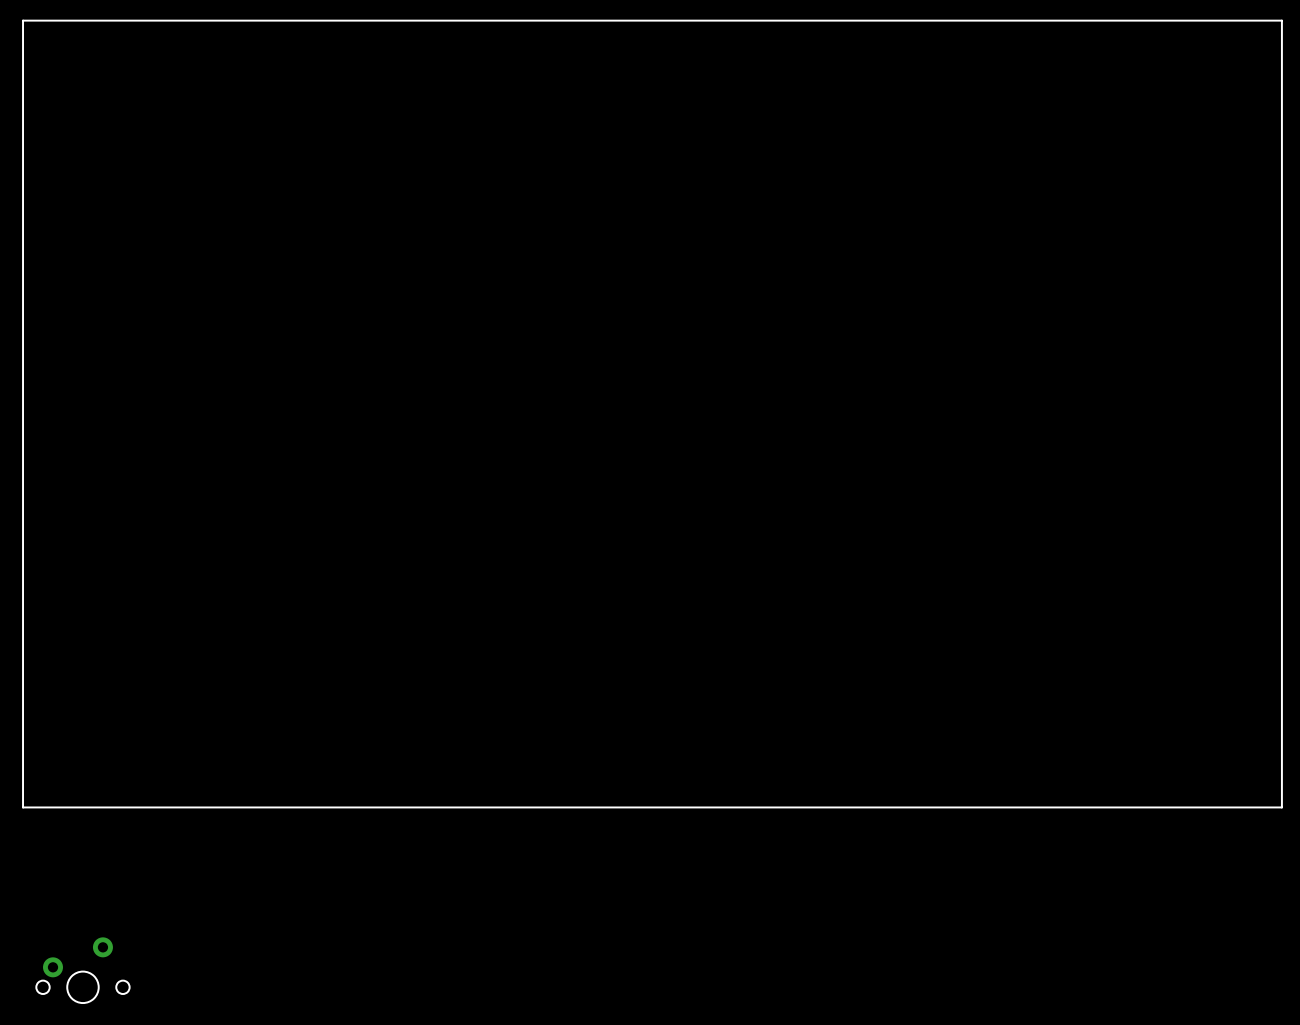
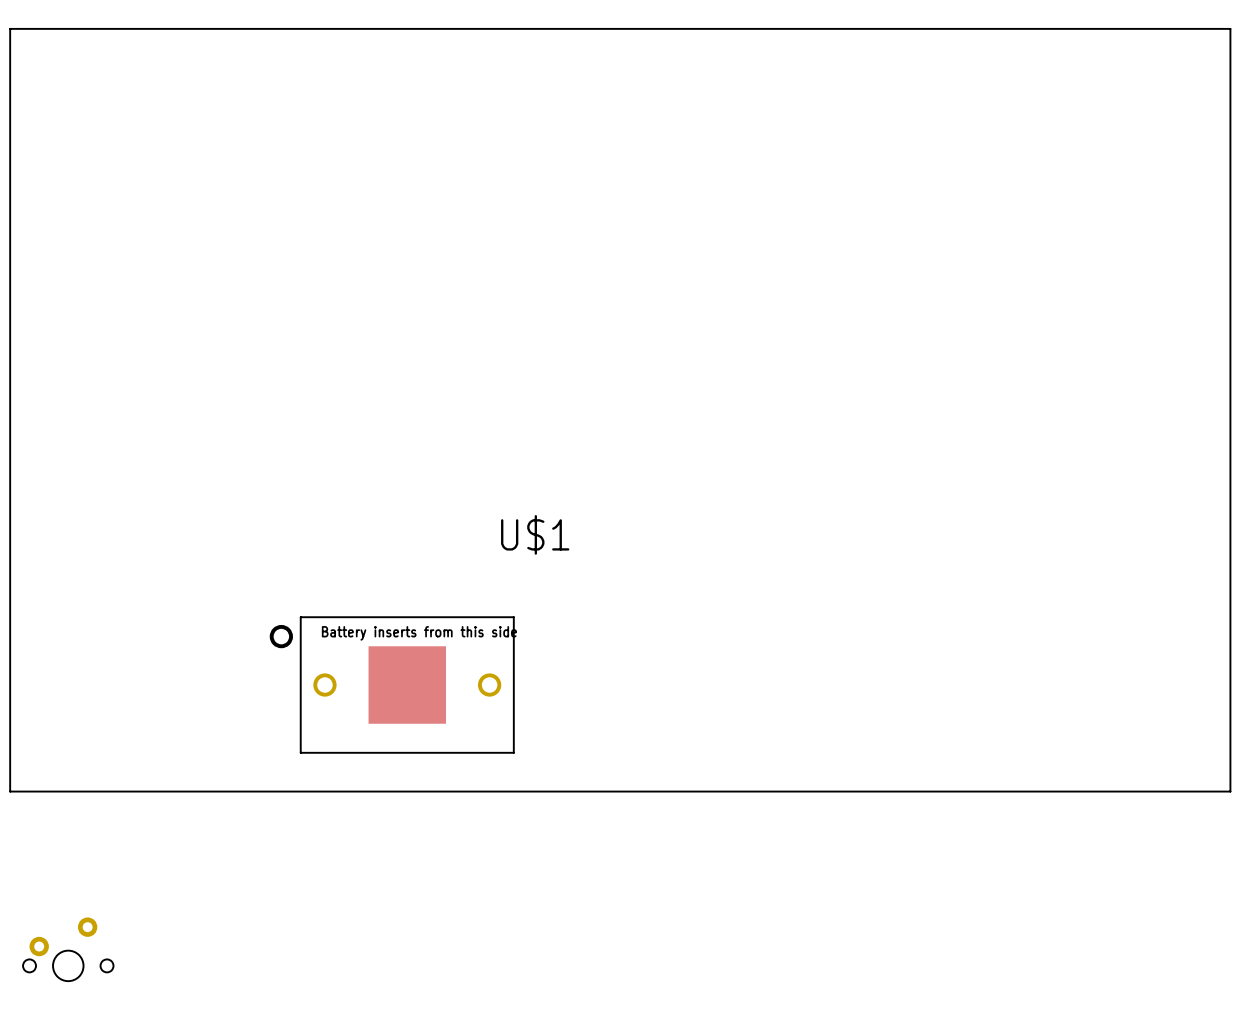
U$1: none -> (392, 685)

